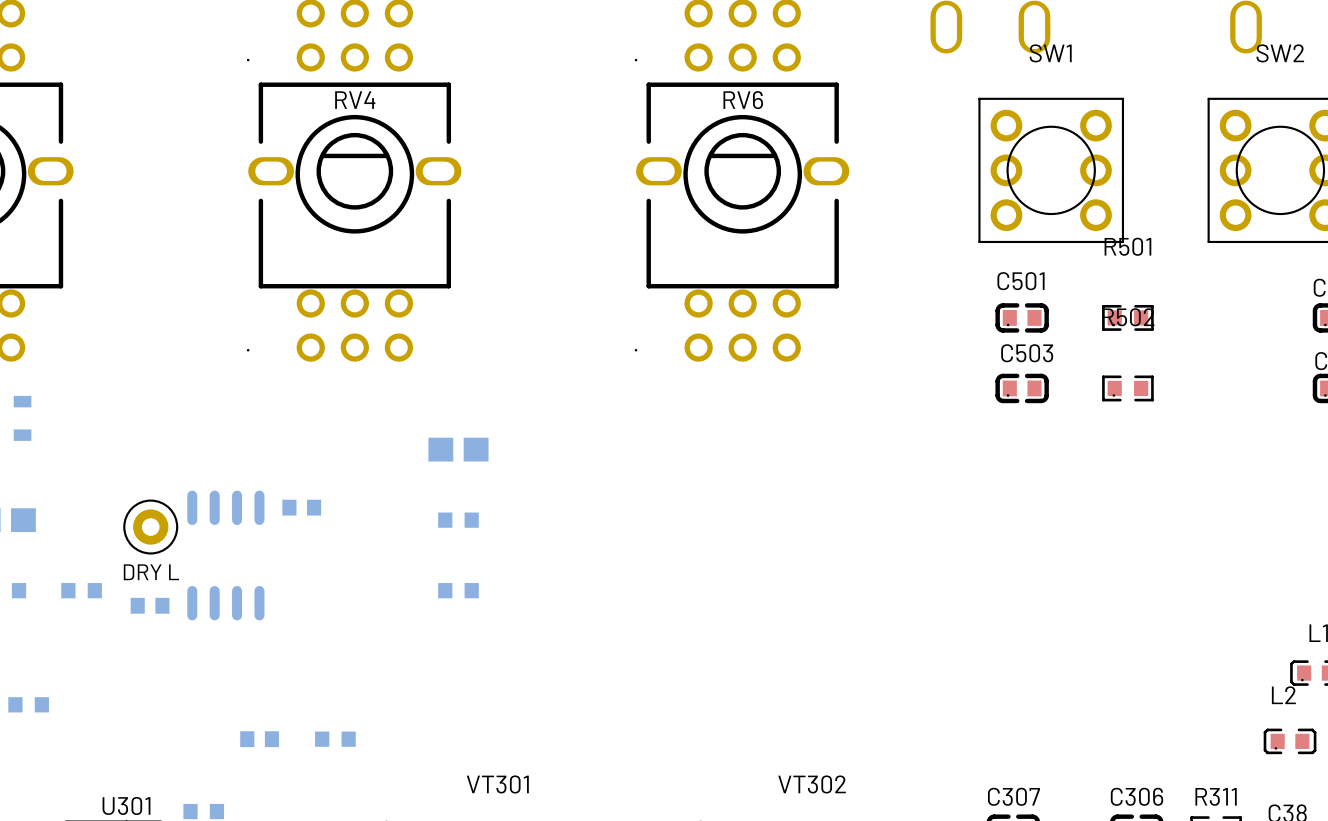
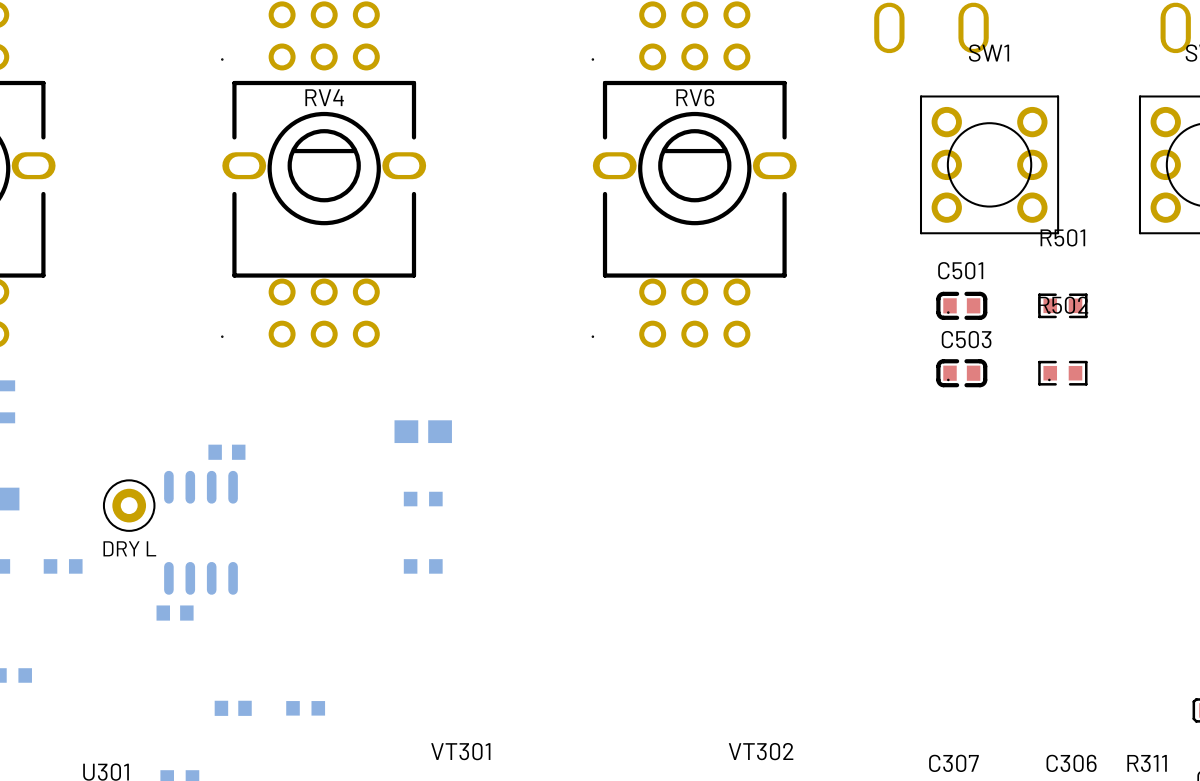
part position: (301, 507) -> (226, 452)
part position: (150, 605) -> (175, 613)

